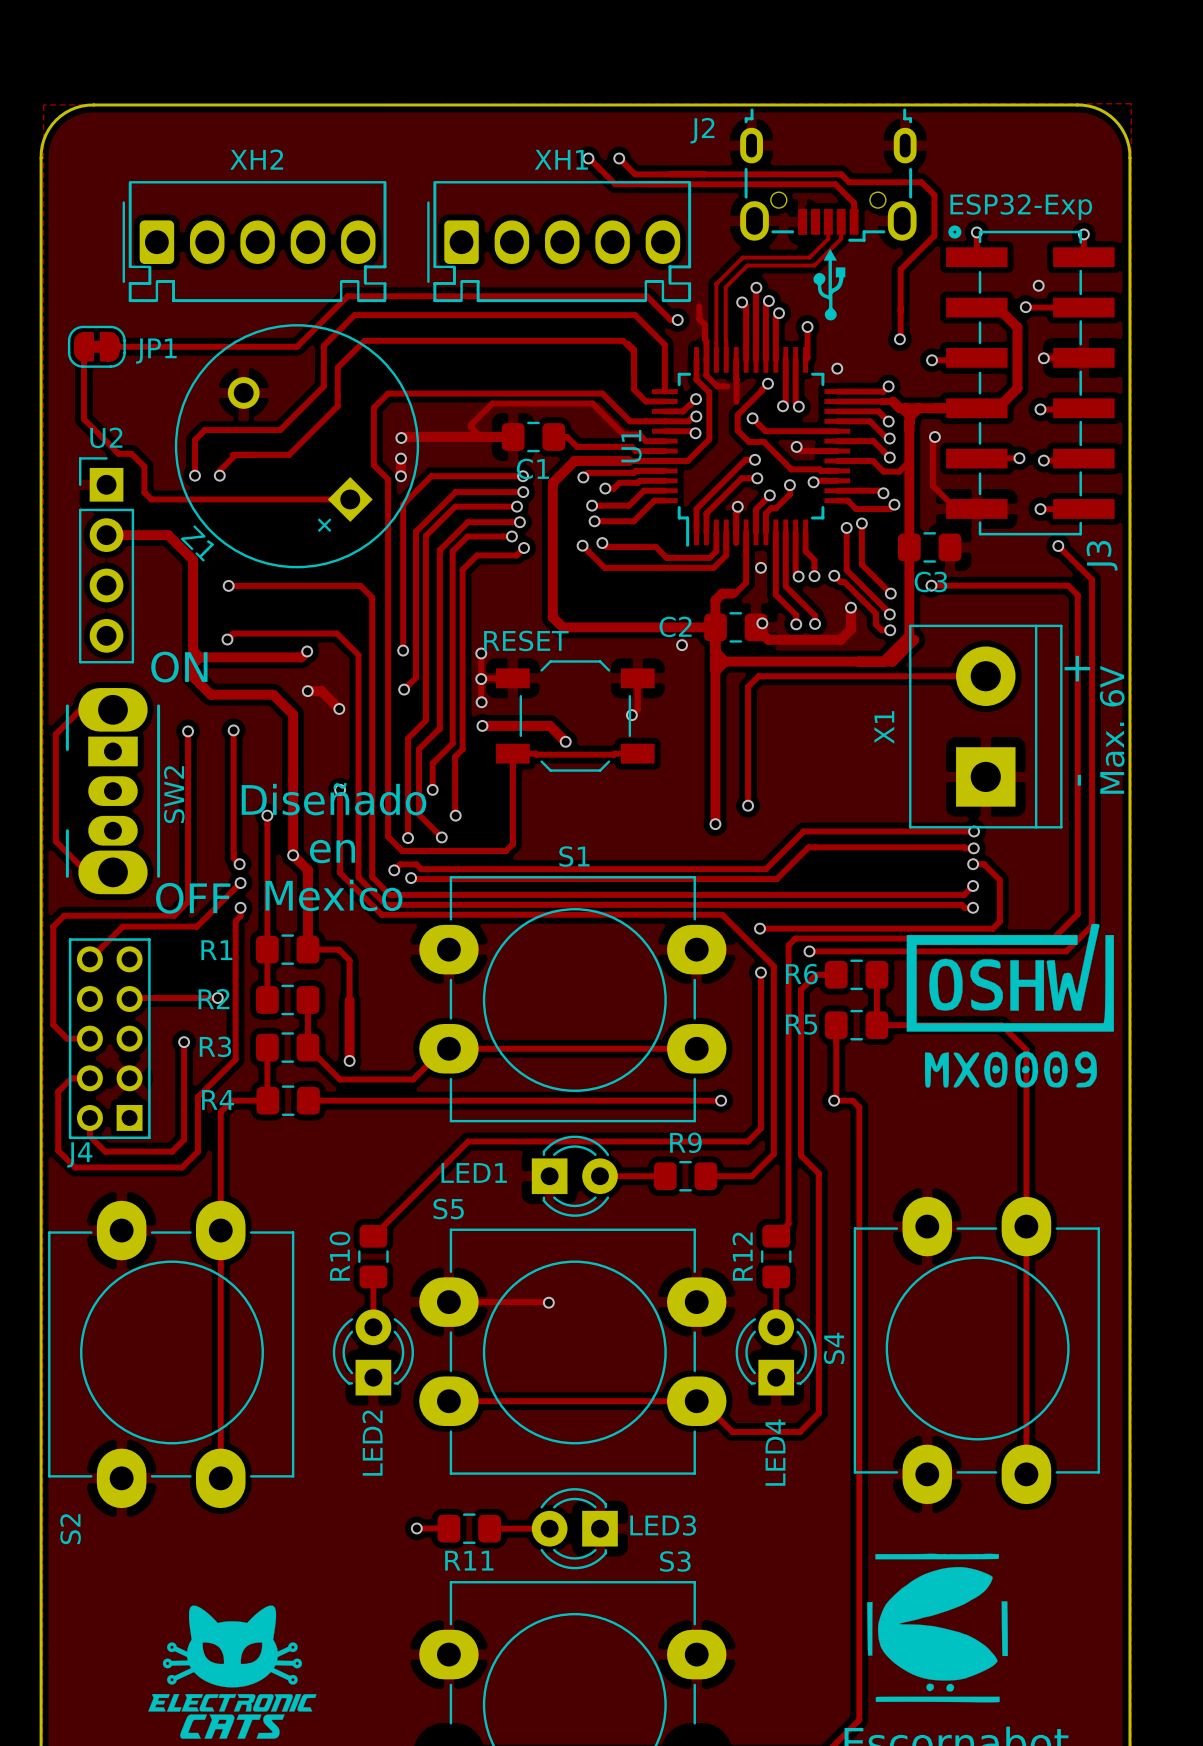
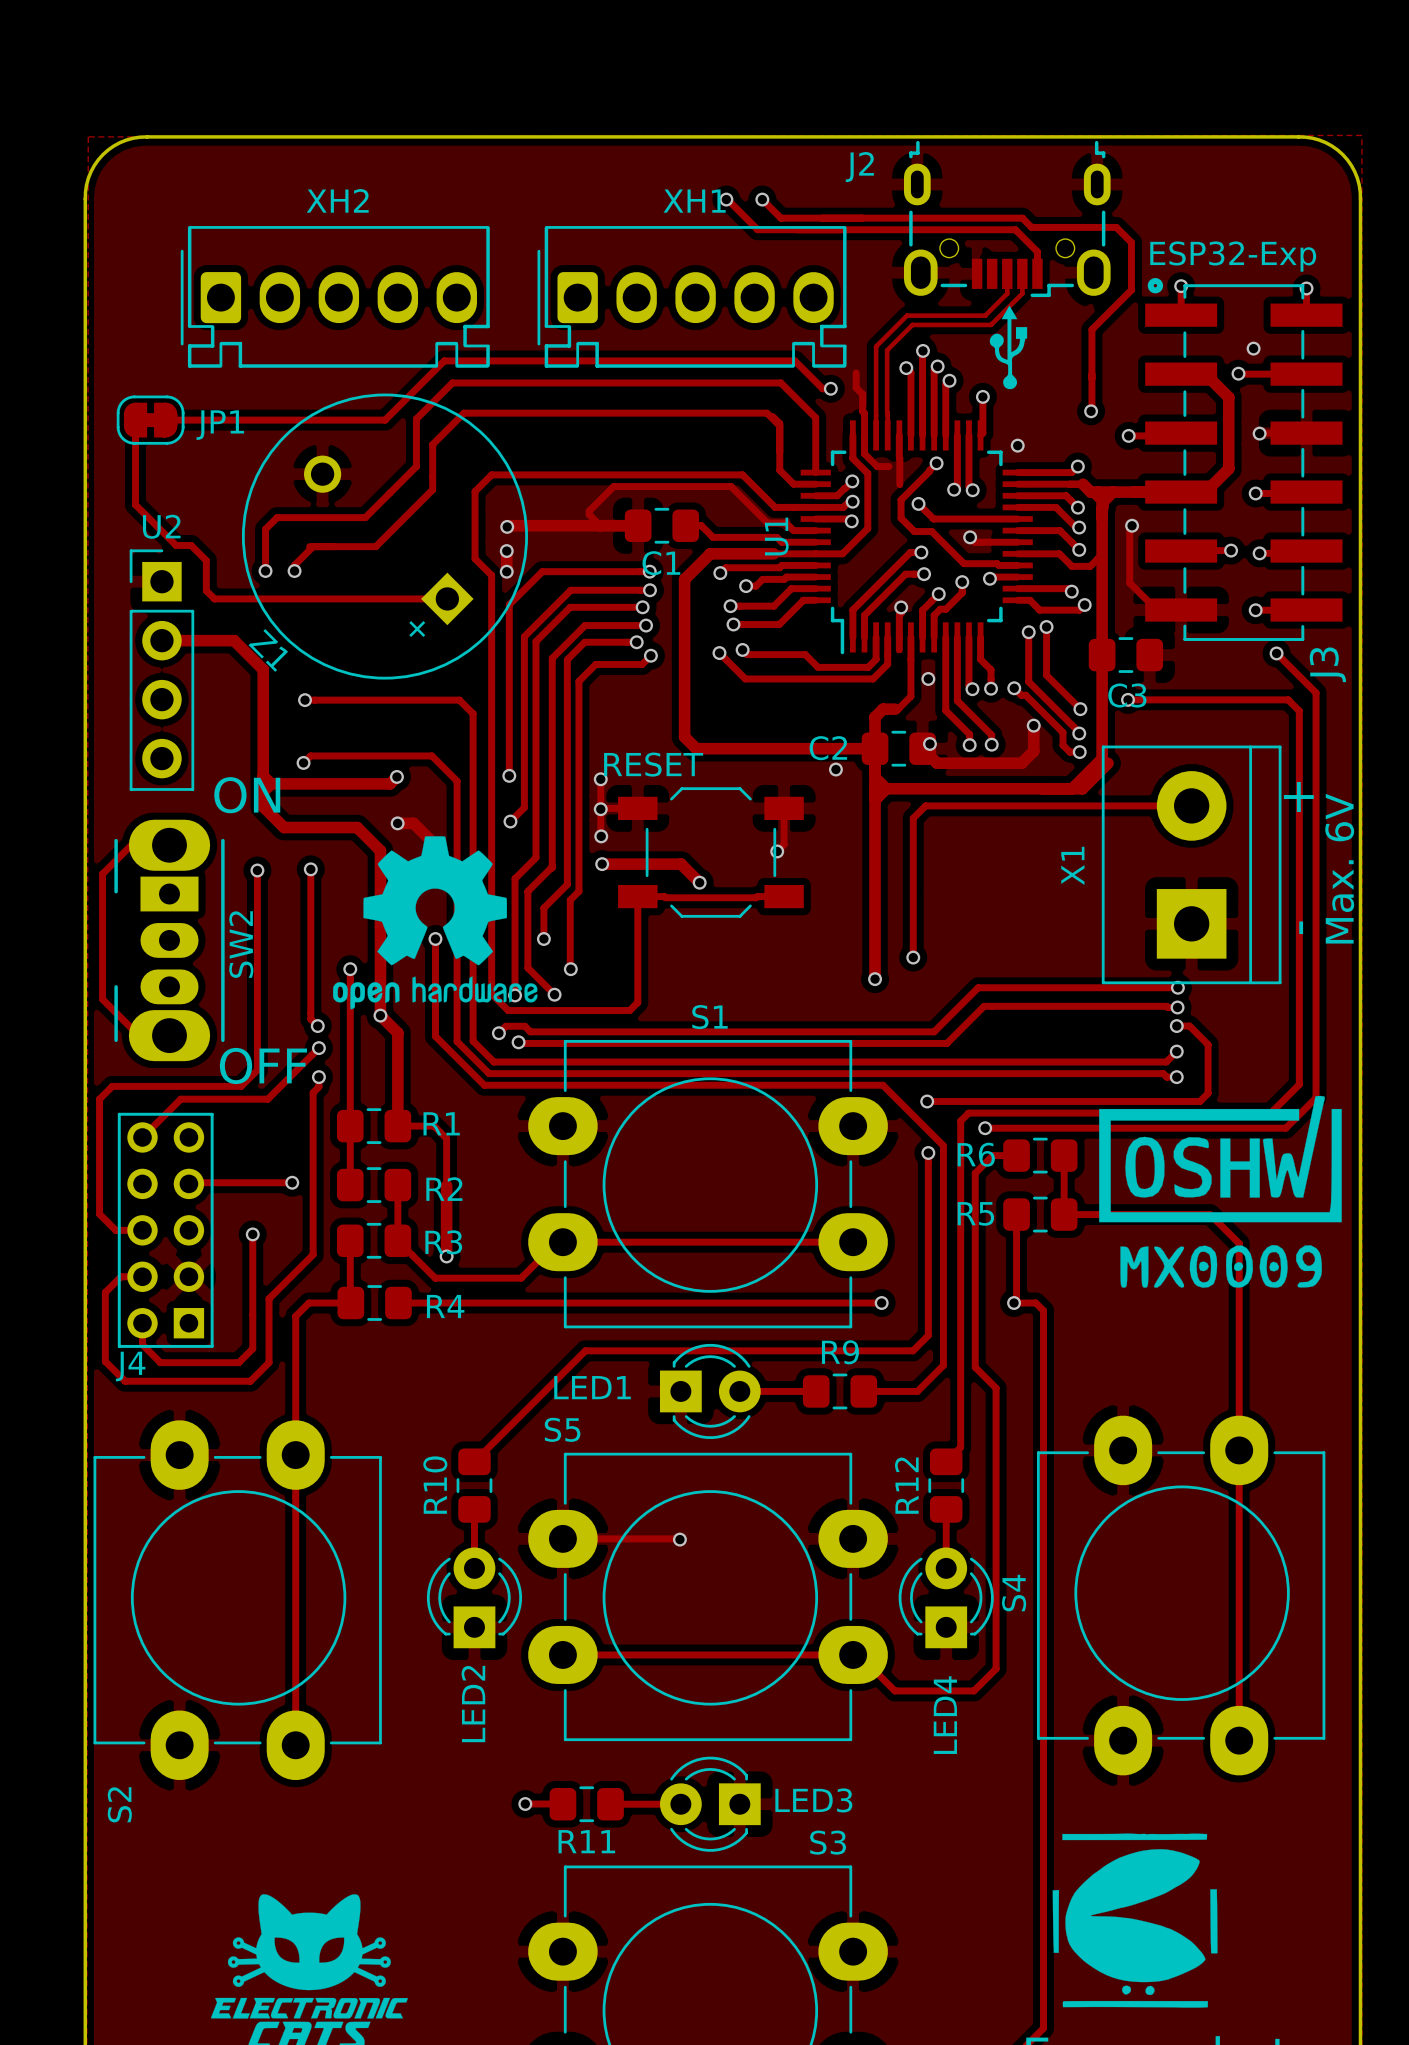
drawing: none -> [333, 836, 538, 1010]
text: Diseñado (334, 799) -> none
text: en (332, 851) -> none
text: Mexico (334, 895) -> none
R1 name position: R1 (216, 950) -> R1 (441, 1123)
R2 name position: R2 (214, 999) -> R2 (444, 1189)
R3 name position: R3 (215, 1046) -> R3 (443, 1242)
R4 name position: R4 (218, 1099) -> R4 (445, 1306)

